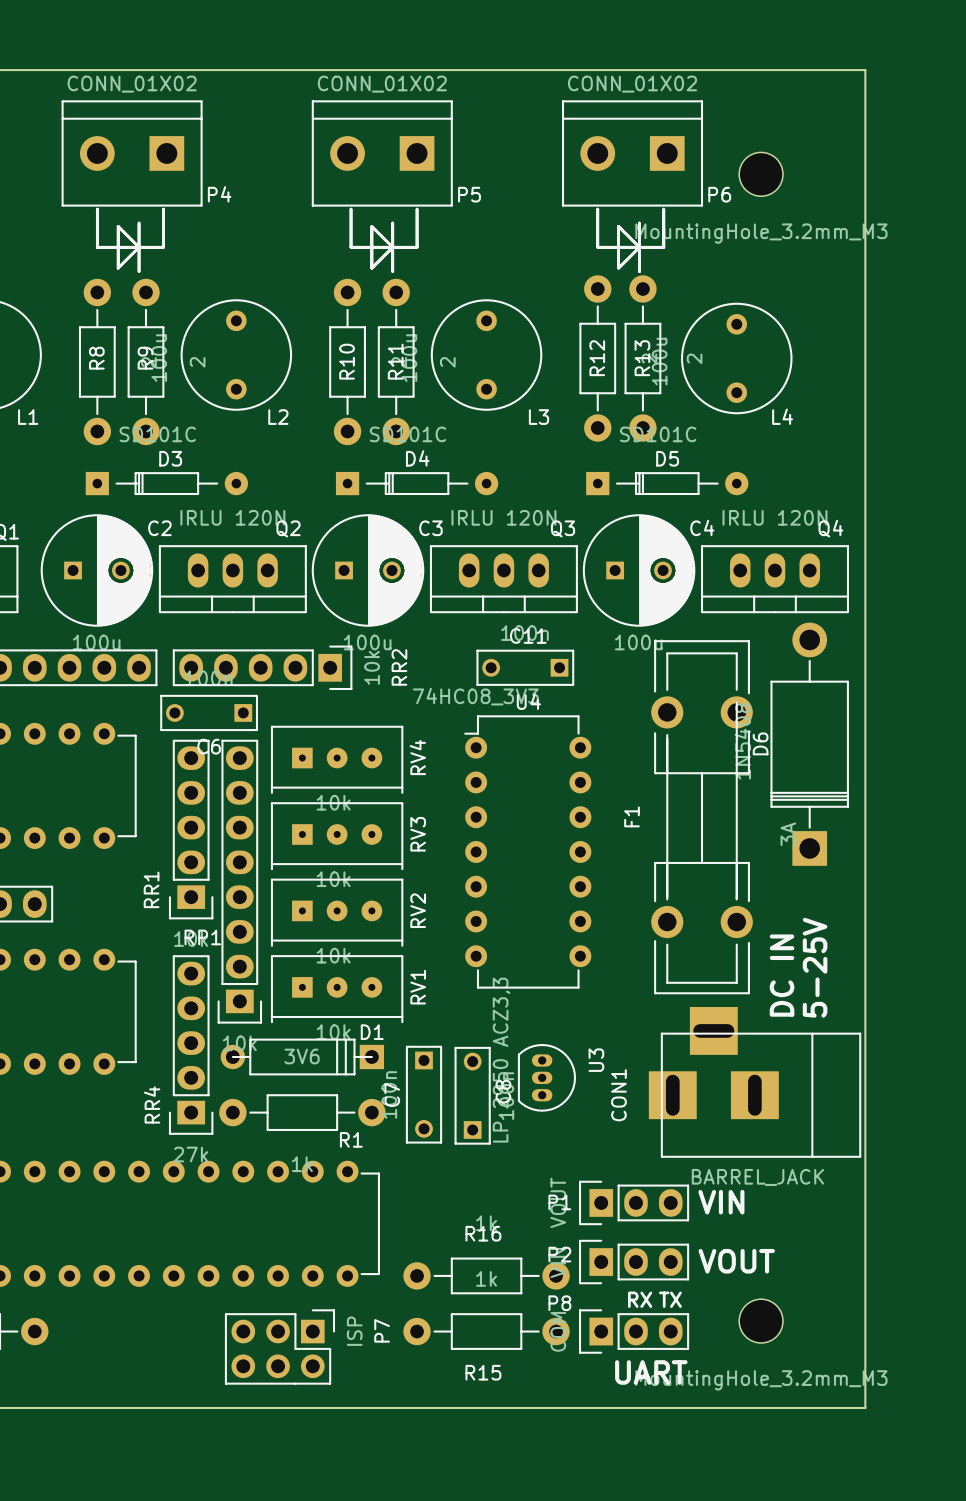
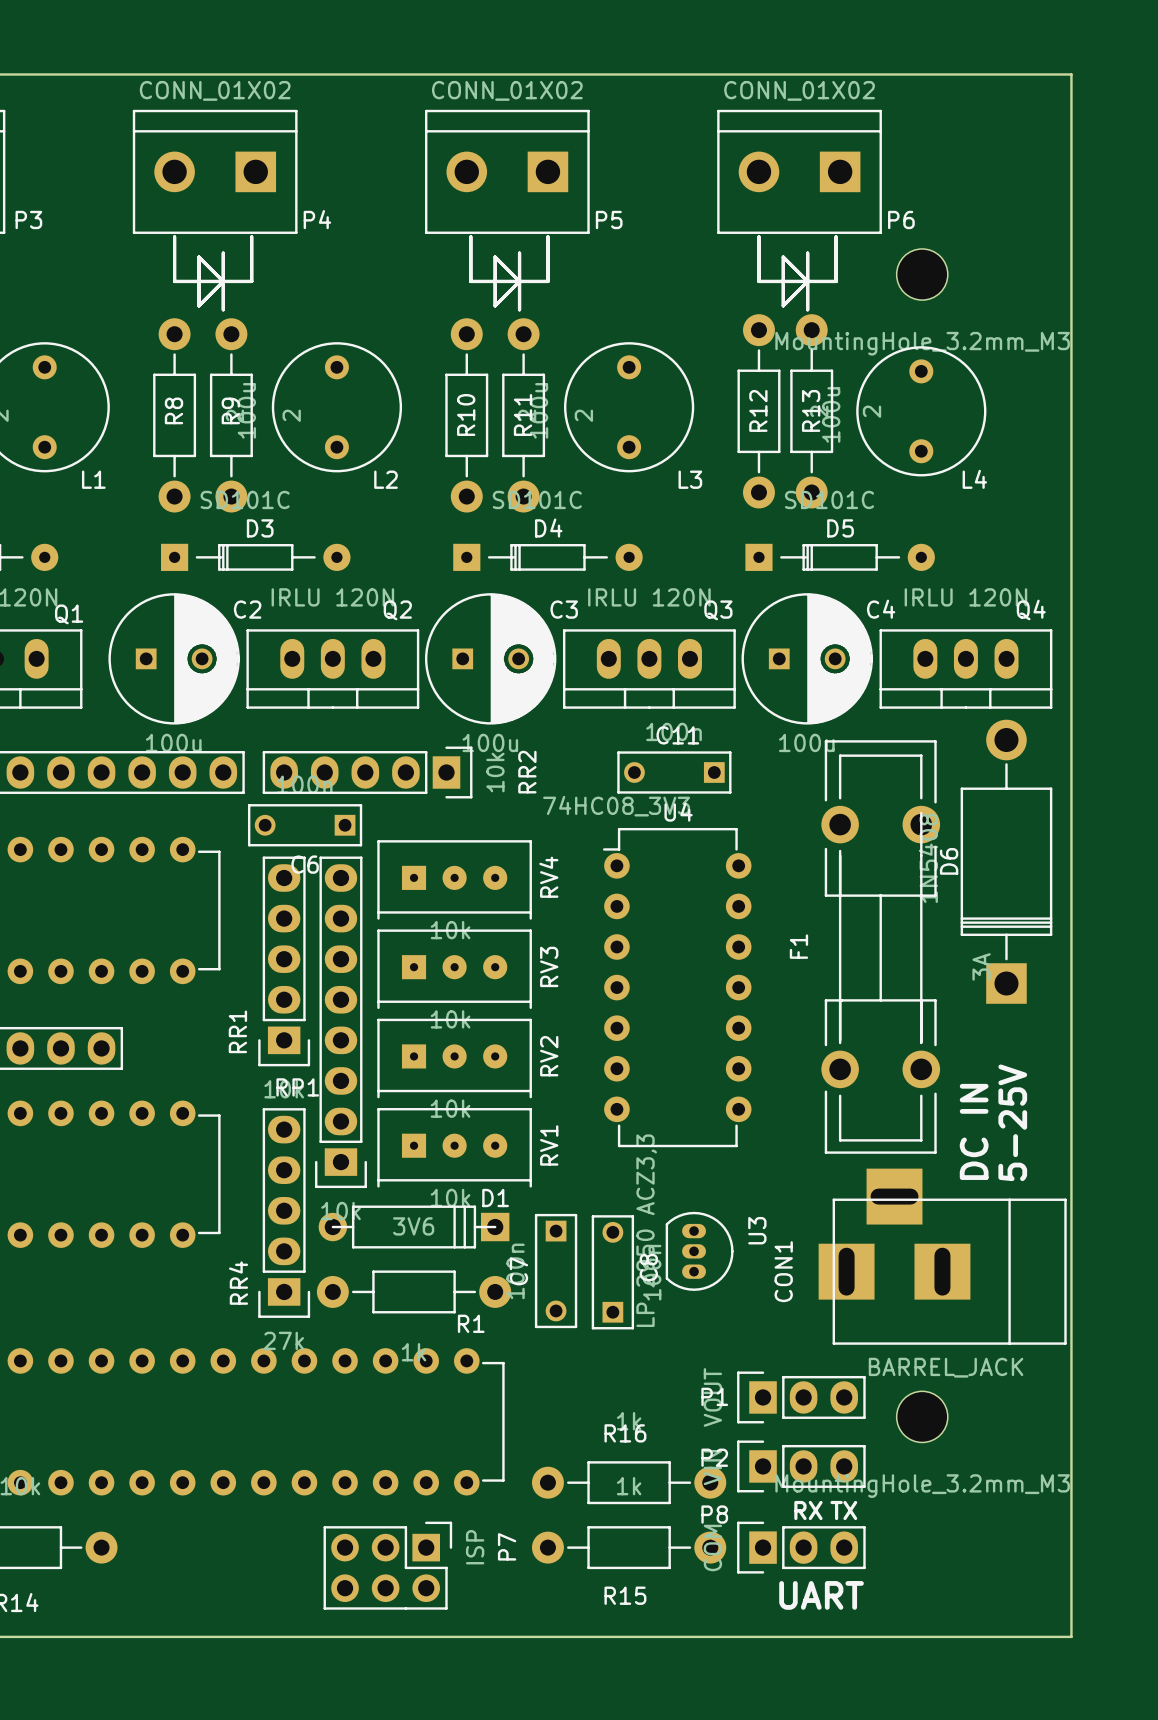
part position: (761, 174) -> (922, 274)
text: VIN (721, 1202) -> none
text: VOUT (736, 1261) -> none
part position: (761, 1321) -> (922, 1416)

